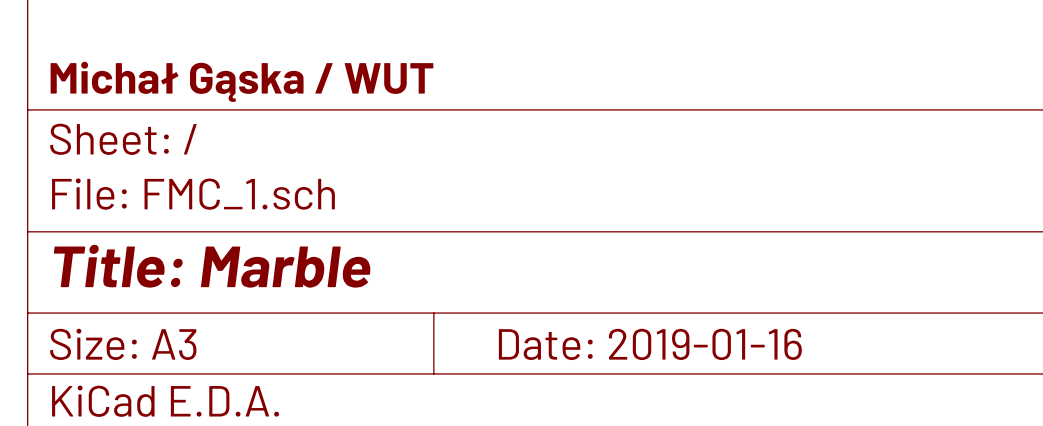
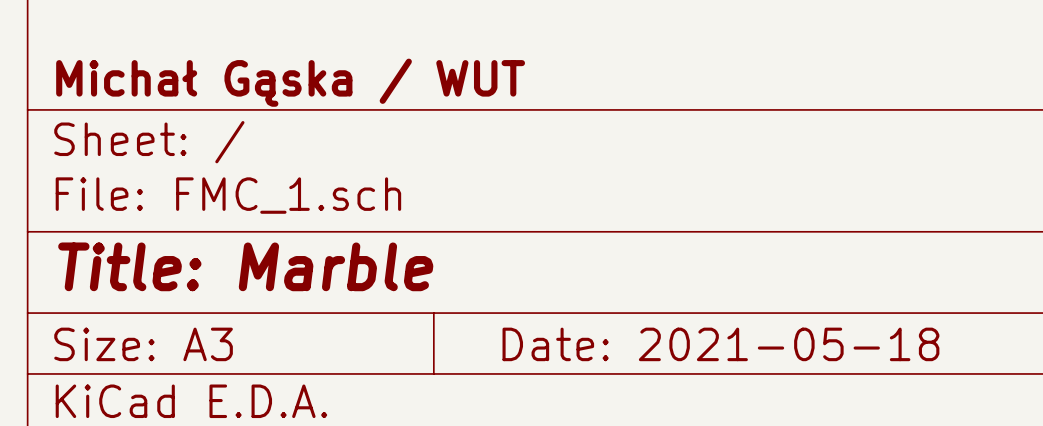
title block: Date: 2019-01-16 (650, 344) -> Date: 2021-05-18 (720, 344)

